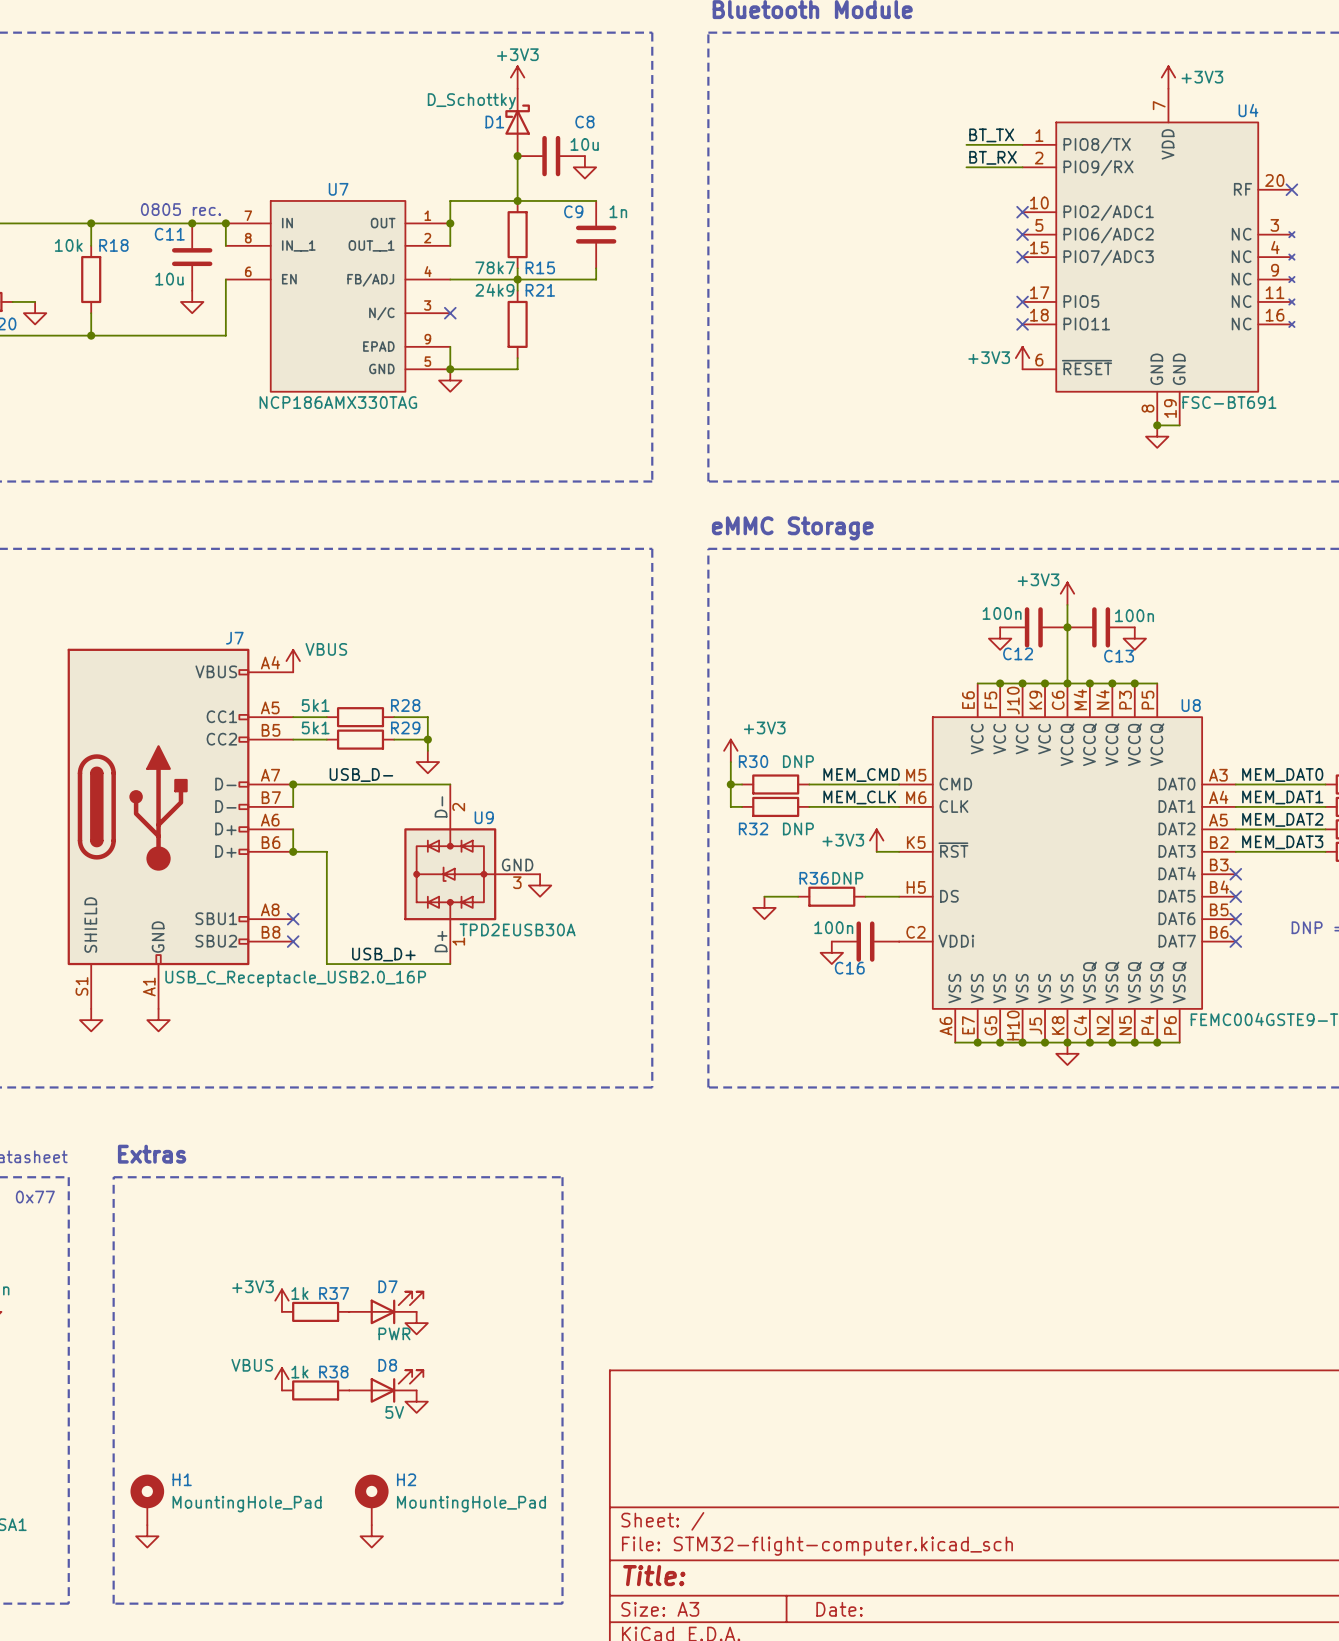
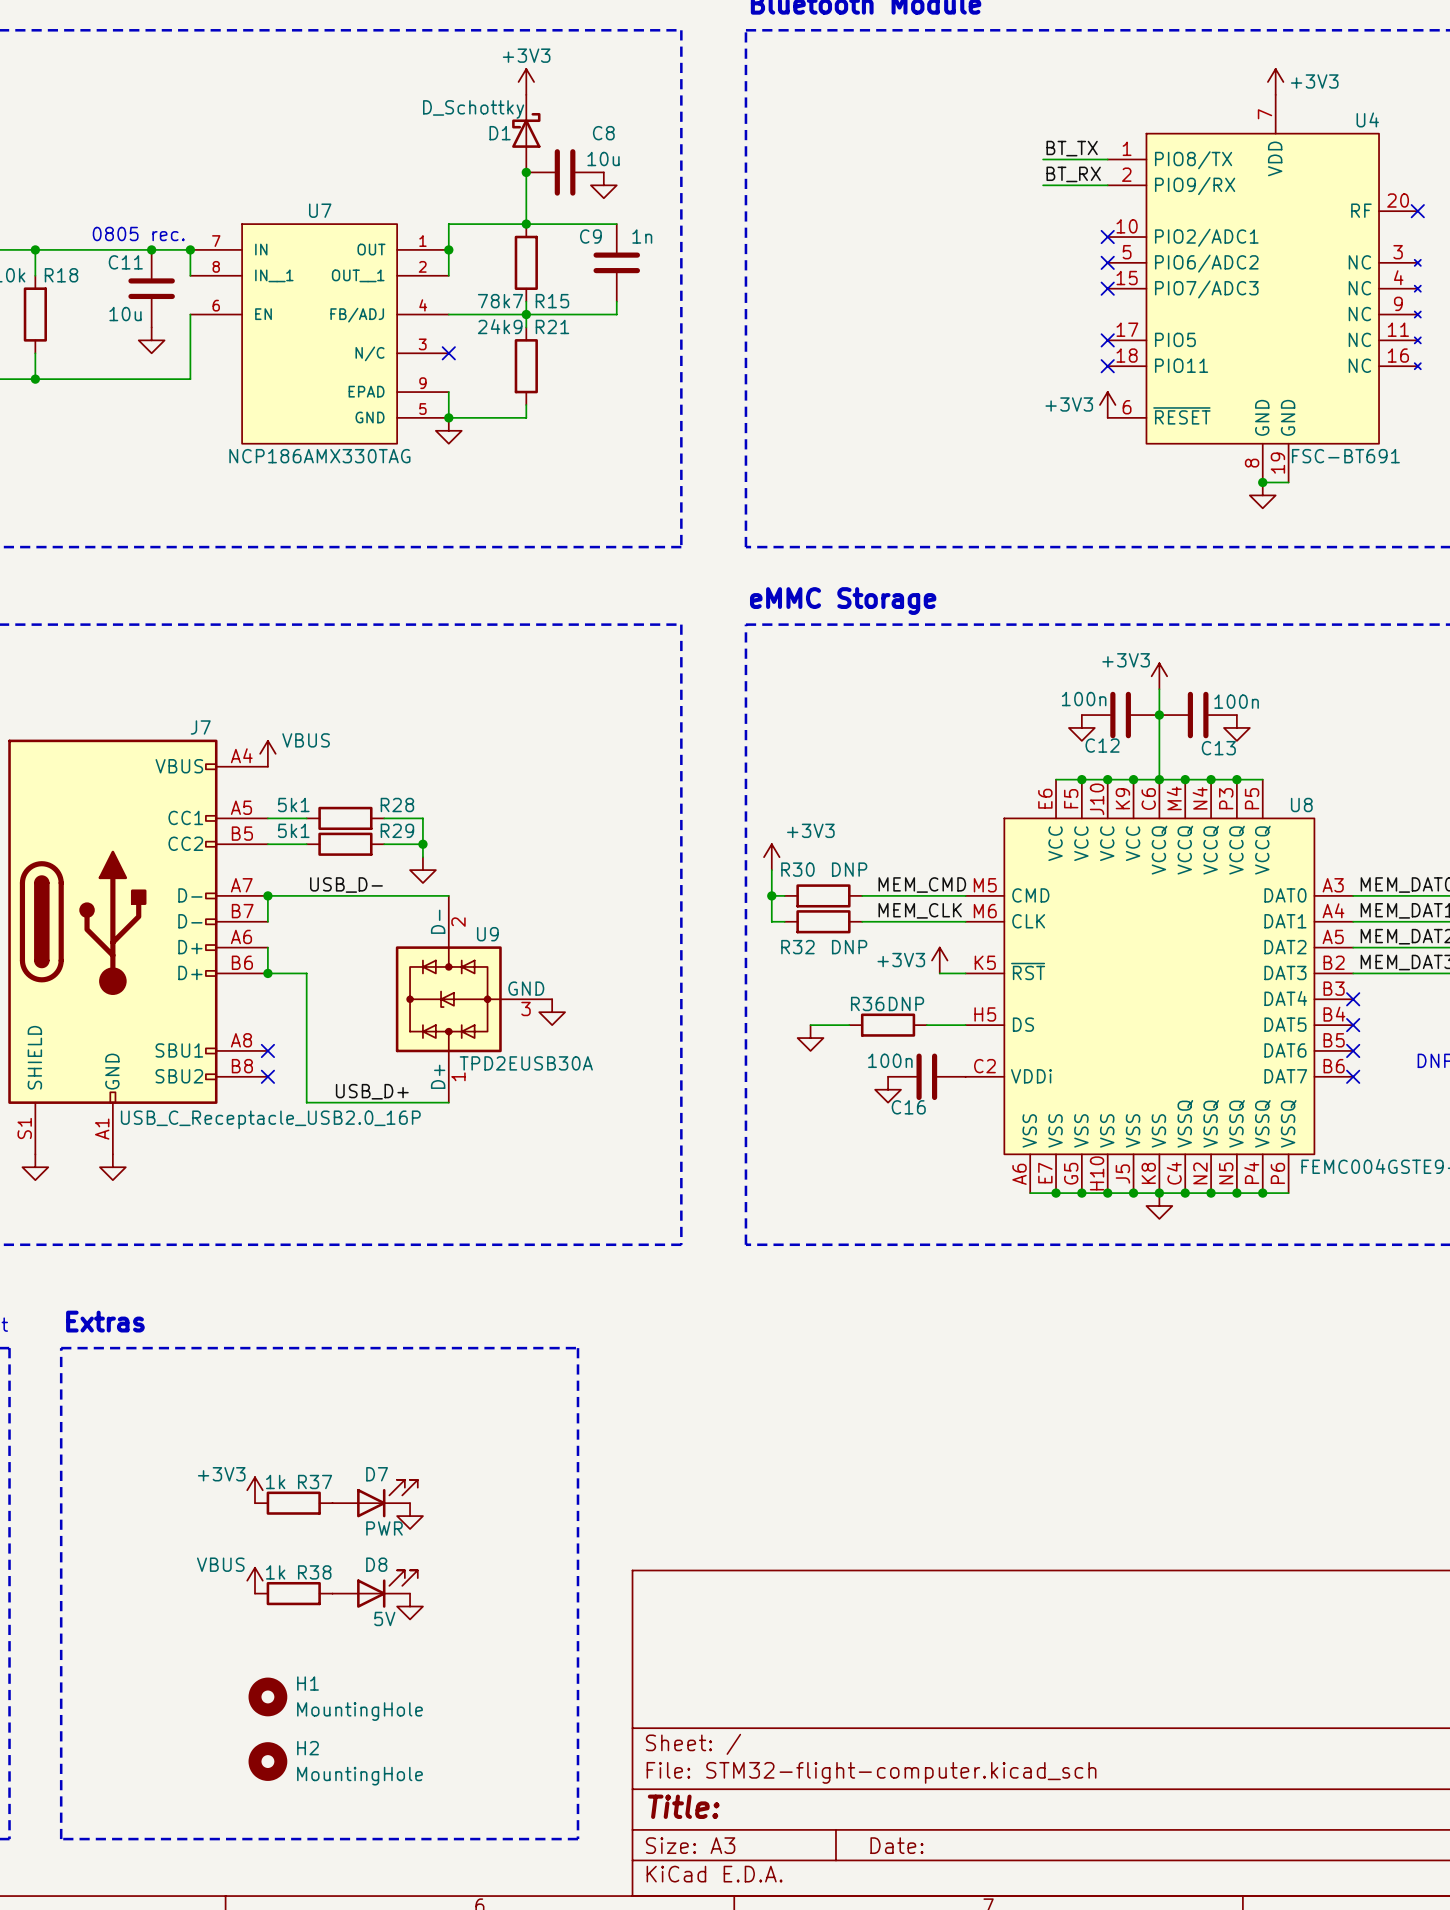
H1 symbol: [130, 1474, 165, 1526] -> [248, 1677, 288, 1717]
H2 symbol: [354, 1474, 389, 1526] -> [248, 1742, 288, 1781]
H1 value: MountingHole_Pad (247, 1504) -> MountingHole (359, 1711)
H2 value: MountingHole_Pad (471, 1504) -> MountingHole (359, 1776)
power symbol: (147, 1536) -> none
power symbol: (371, 1536) -> none

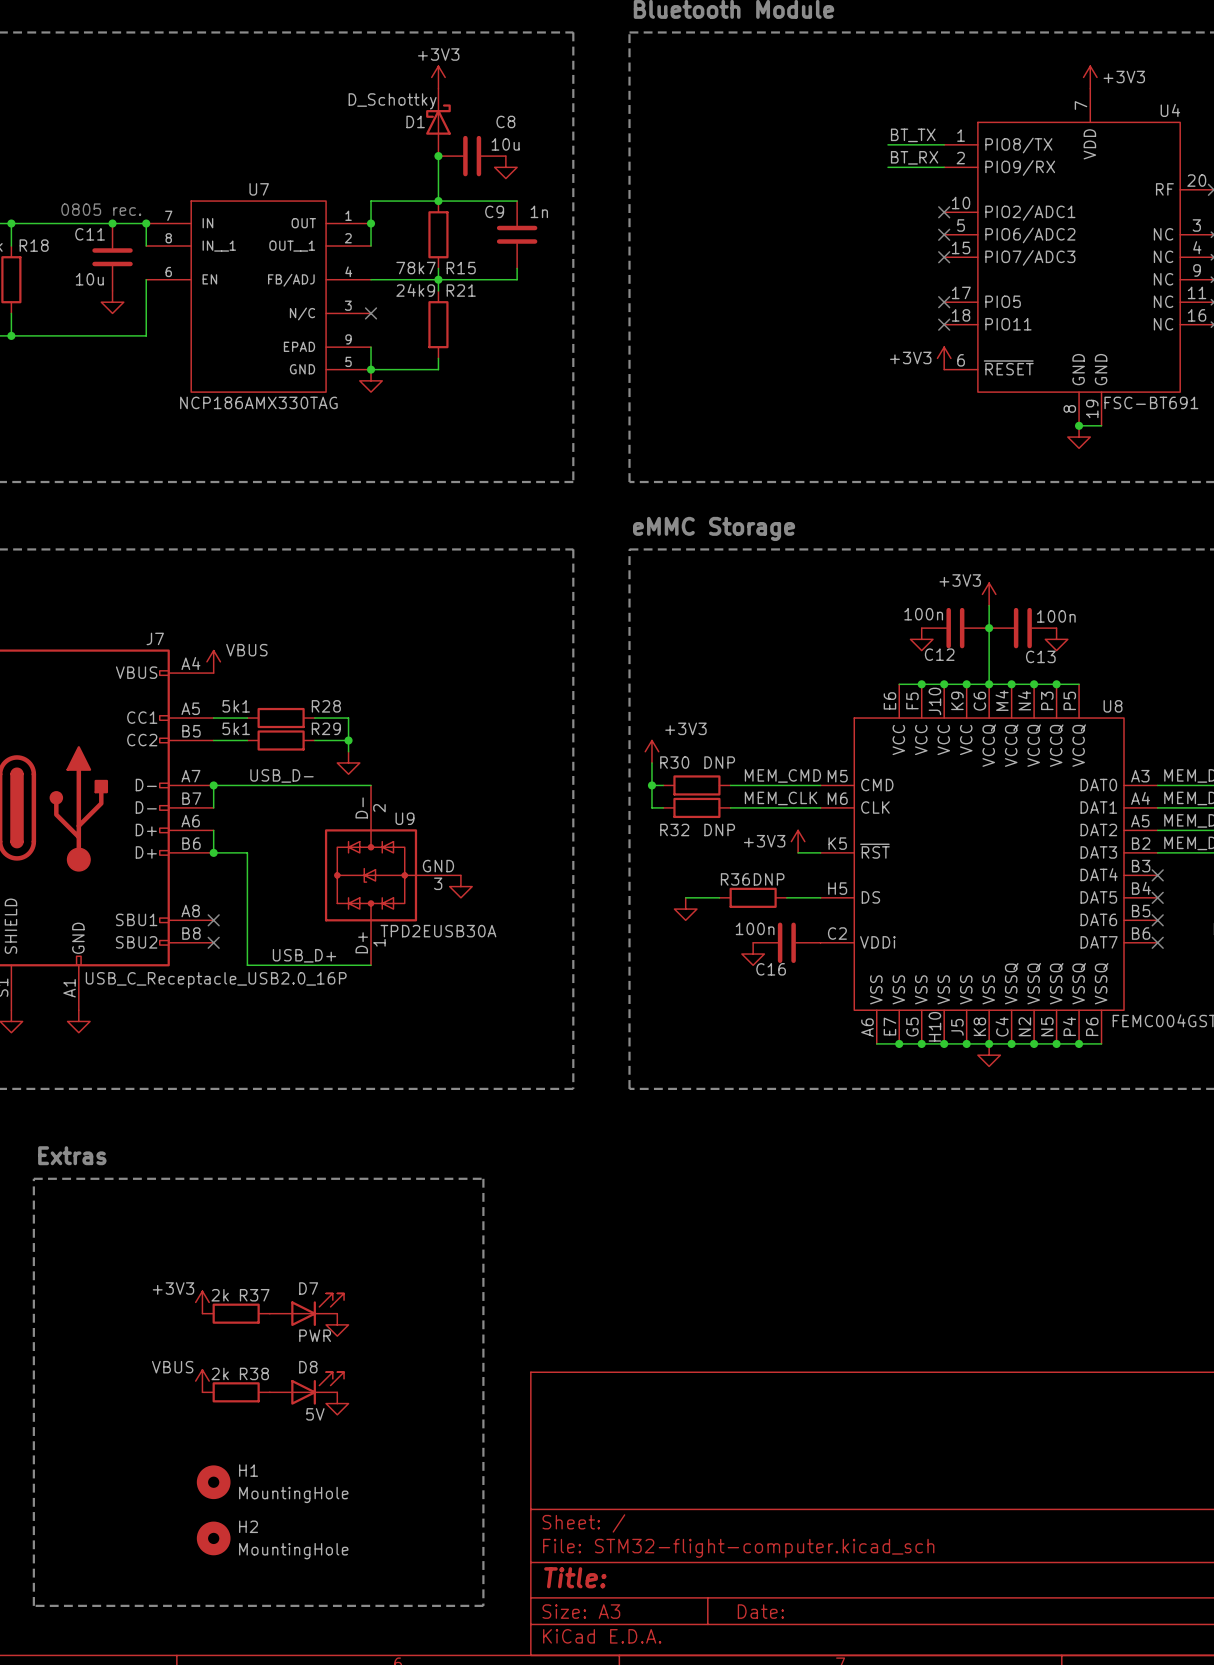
R37 value: 1k (275, 1482) -> 2k (220, 1295)
R38 value: 1k (275, 1572) -> 2k (220, 1373)

